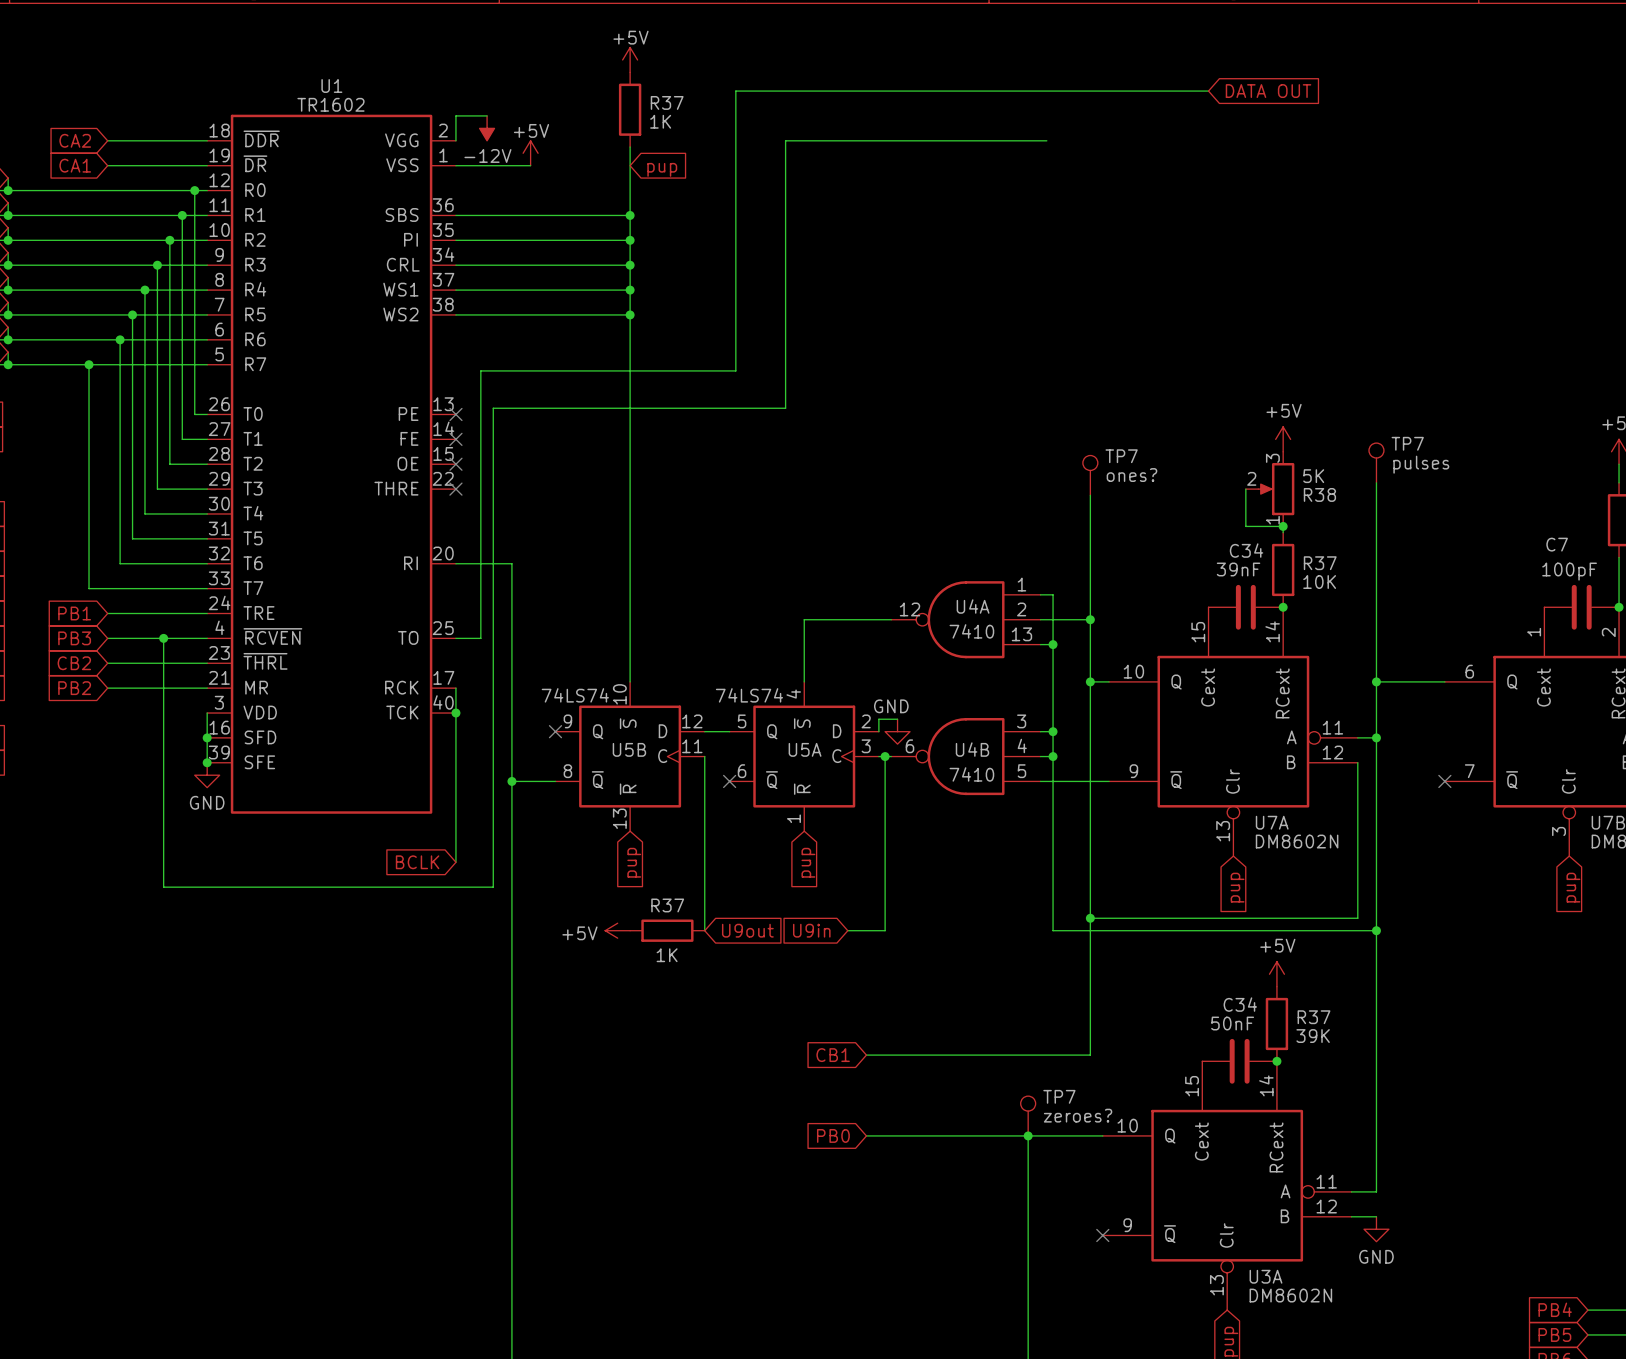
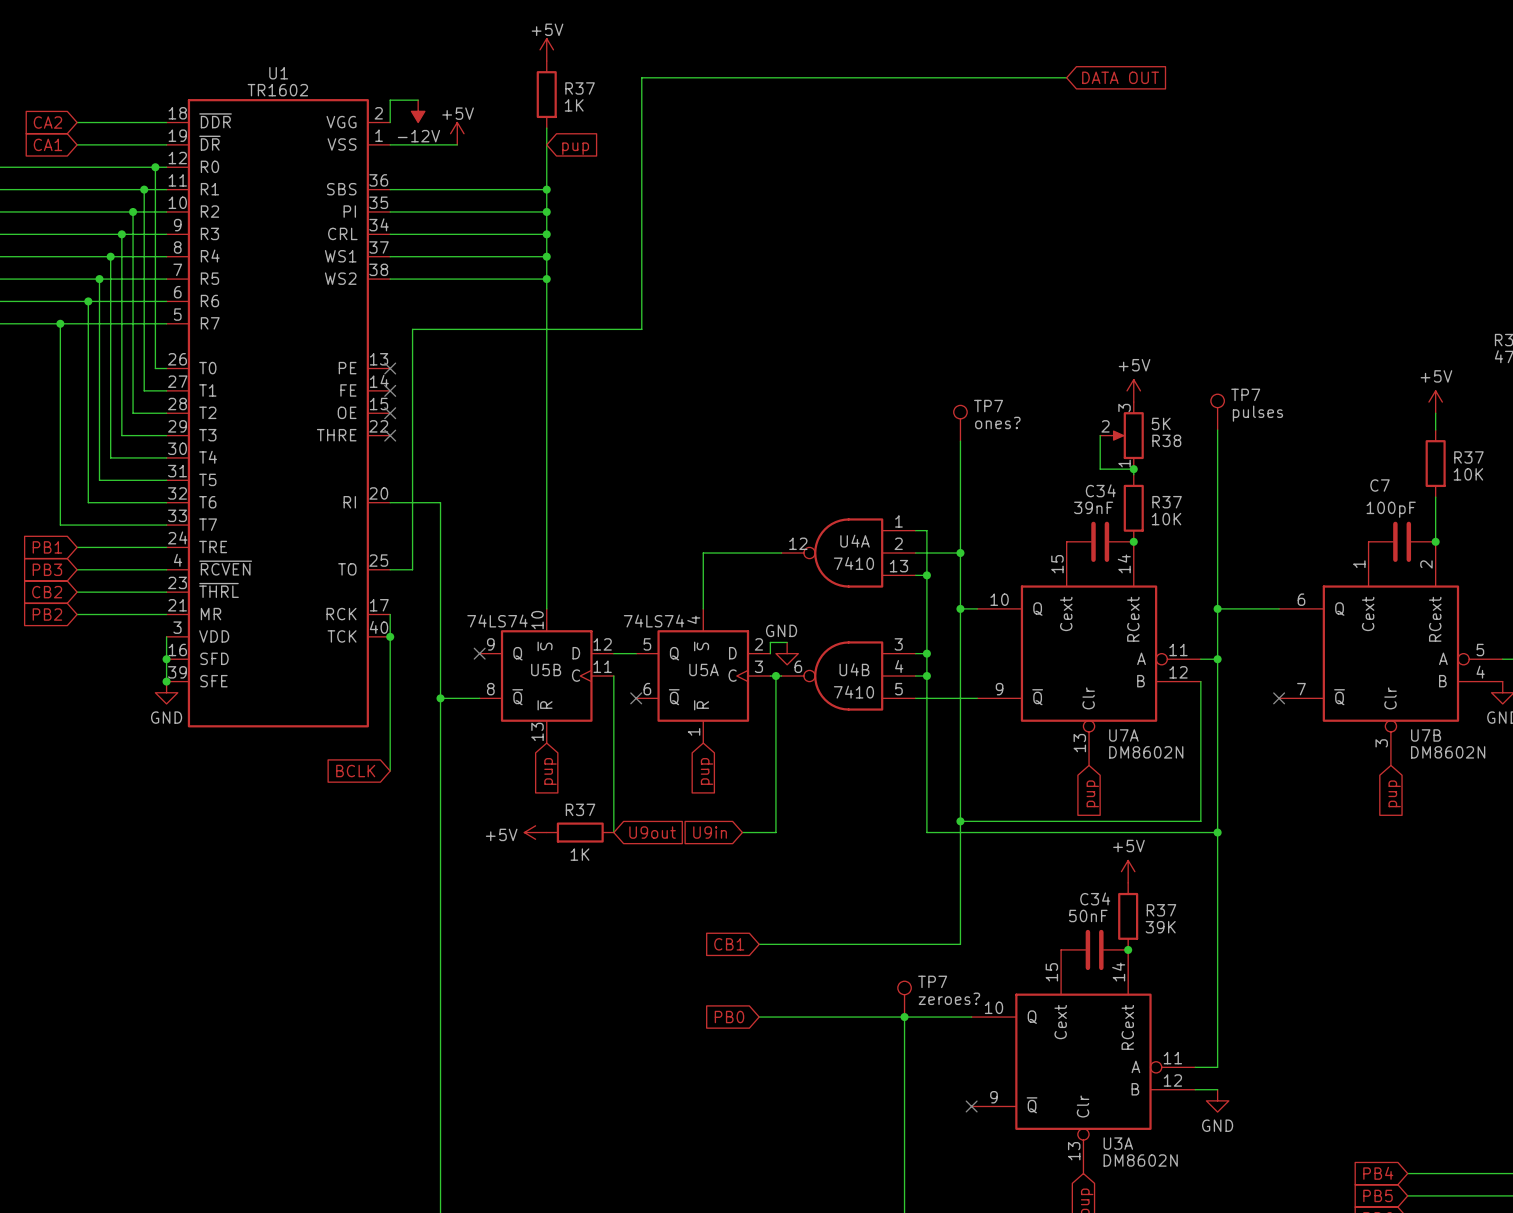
wire: (1046, 140) (785, 140) (785, 408) (493, 408) (493, 887) (163, 887) (163, 638) -> none
junction: (163, 638) -> none

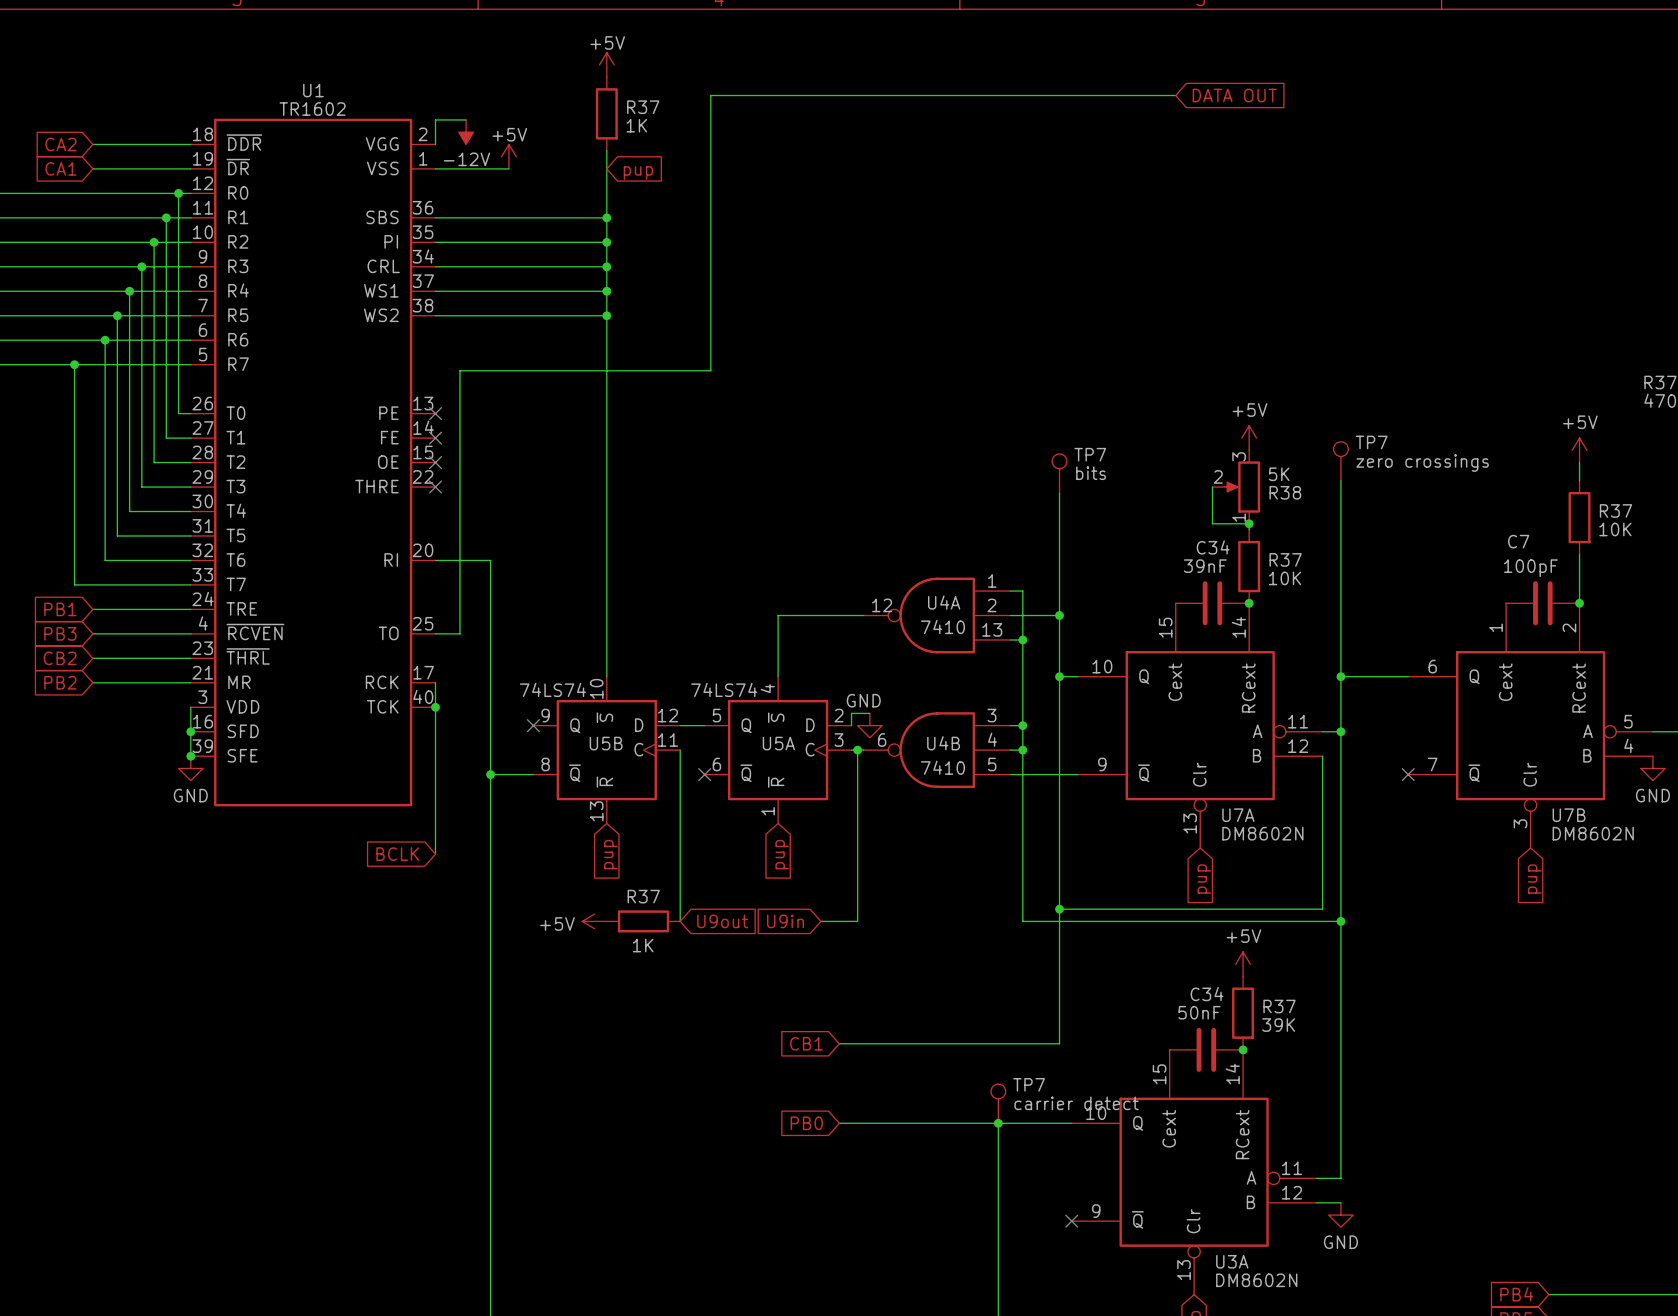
TP7 value: pulses (1257, 413) -> zero crossings (1422, 463)
TP7 value: ones? (997, 422) -> bits (1091, 473)
TP7 value: zeroes? (949, 998) -> carrier detect (1076, 1103)

